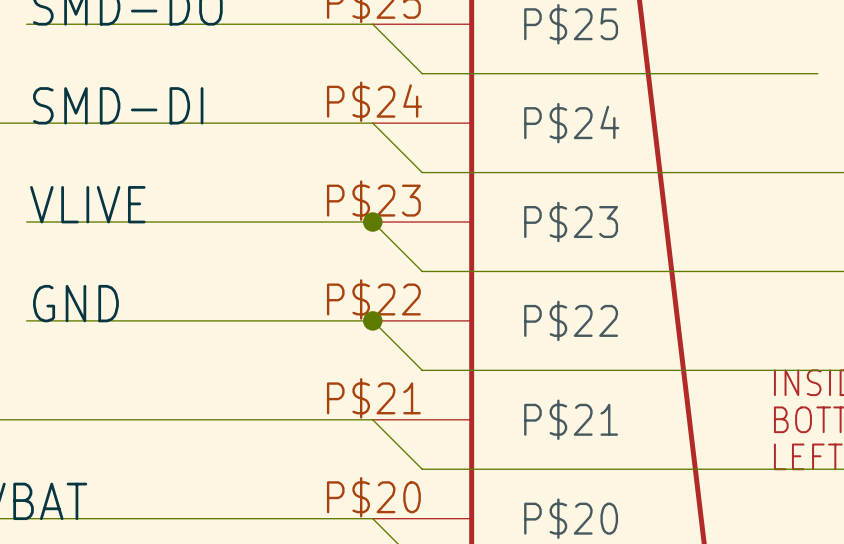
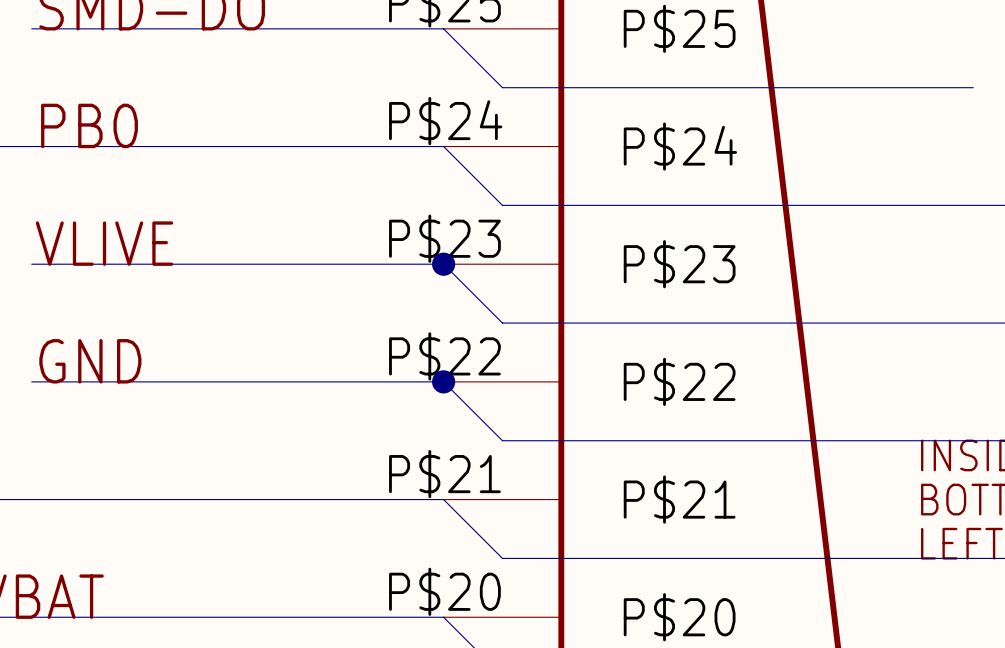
label: SMD-DI (118, 105) -> PB0 (89, 125)

